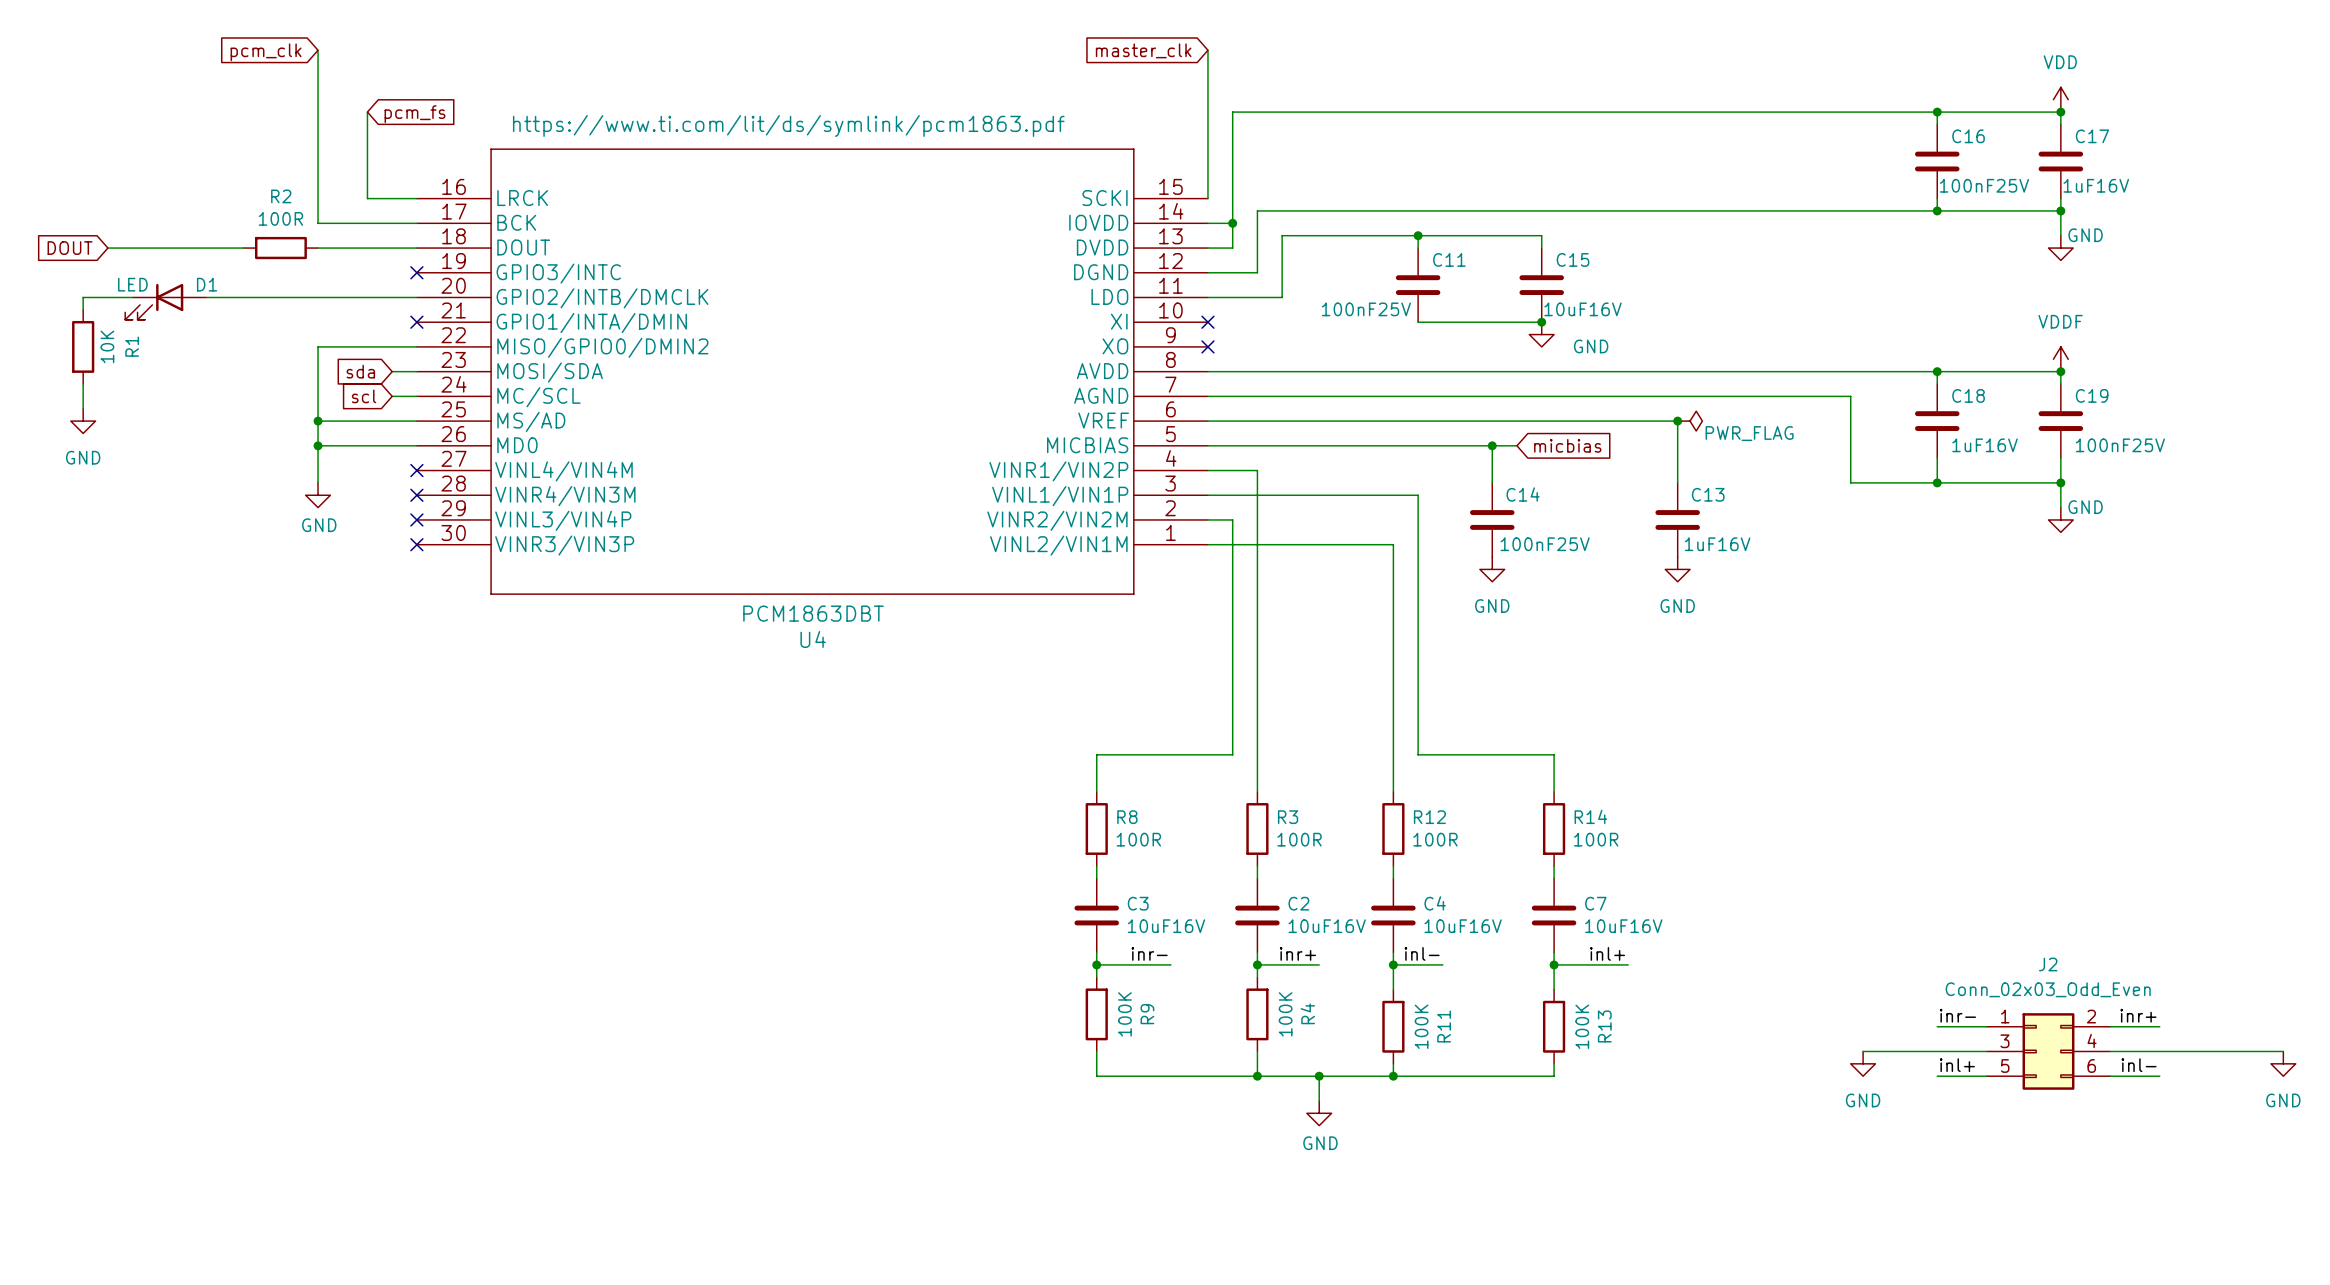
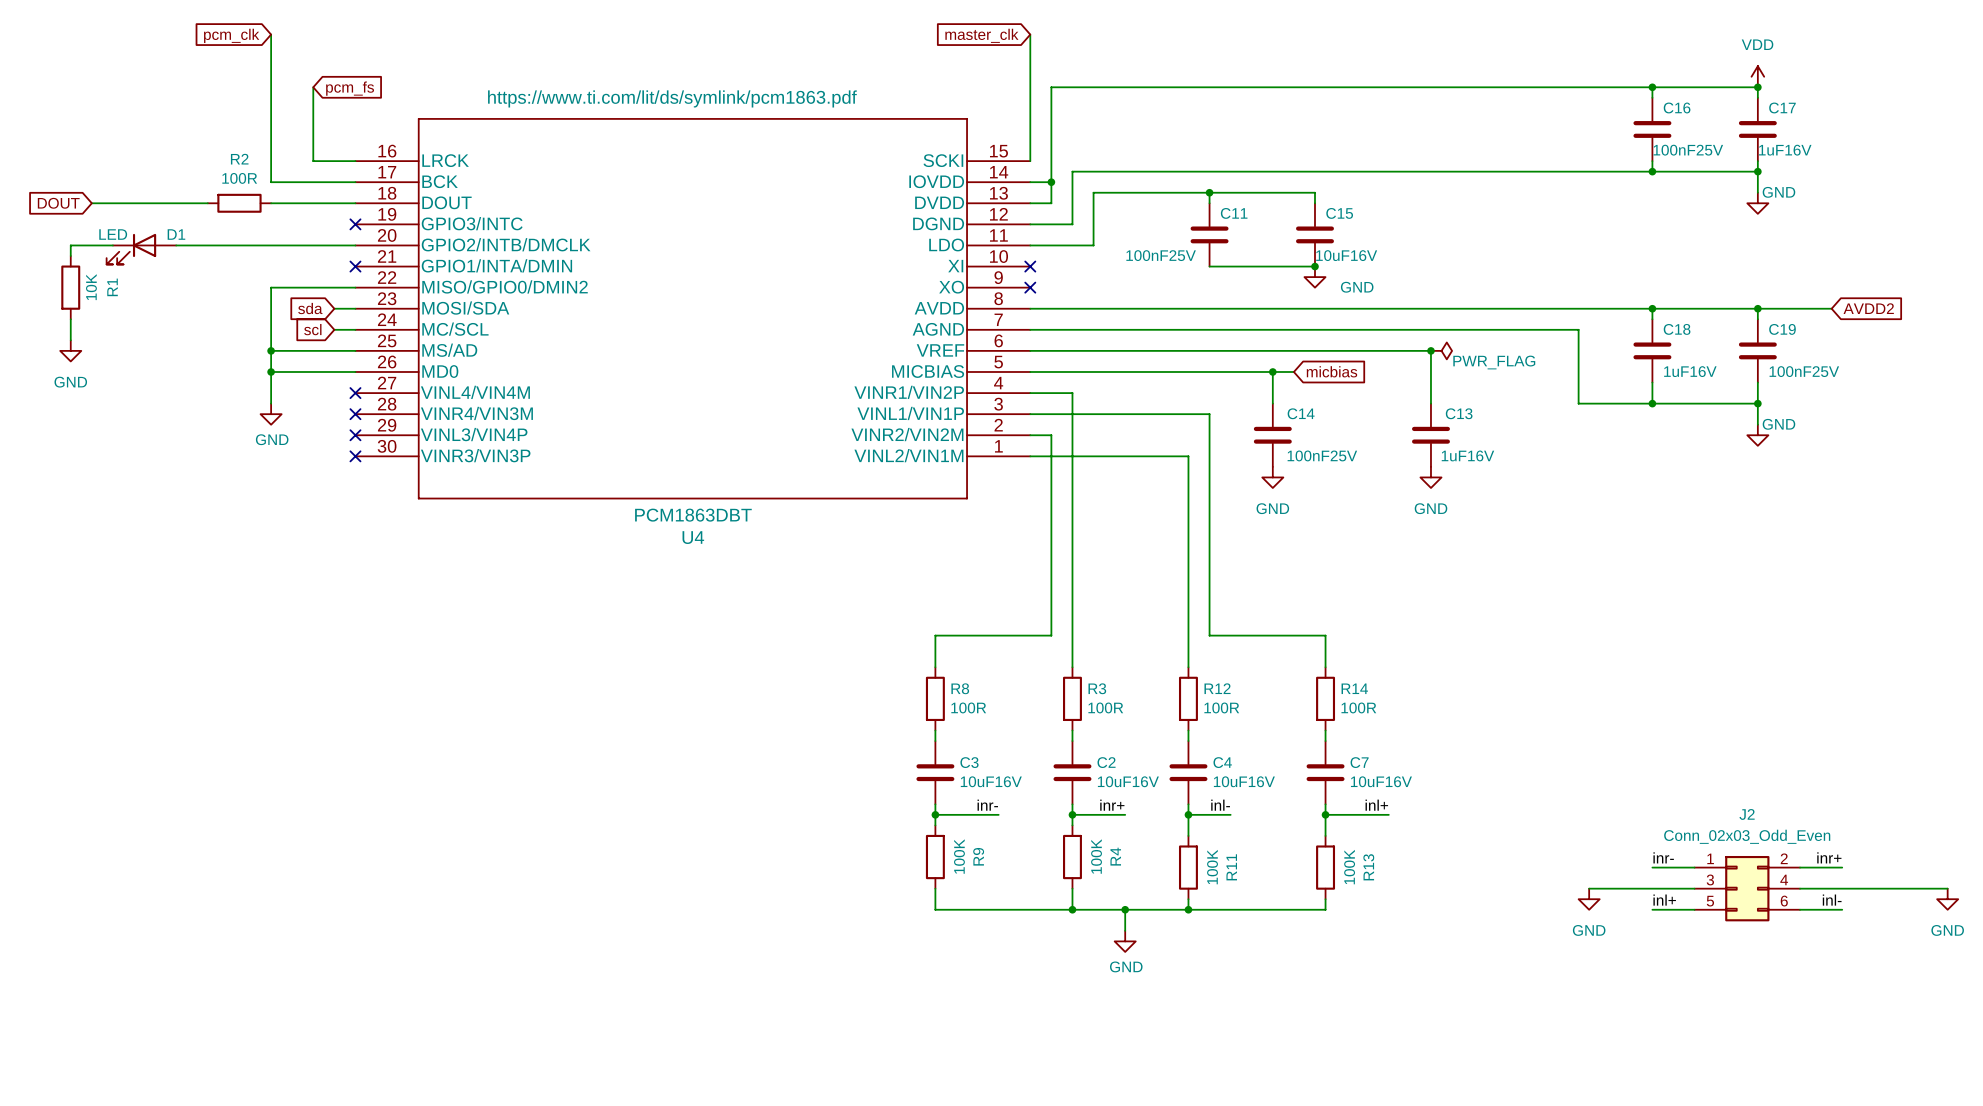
power symbol: VDDF (2060, 359) -> none
wire: none -> (1757, 308) (1831, 308)
global label: none -> AVDD2 (1868, 308)

